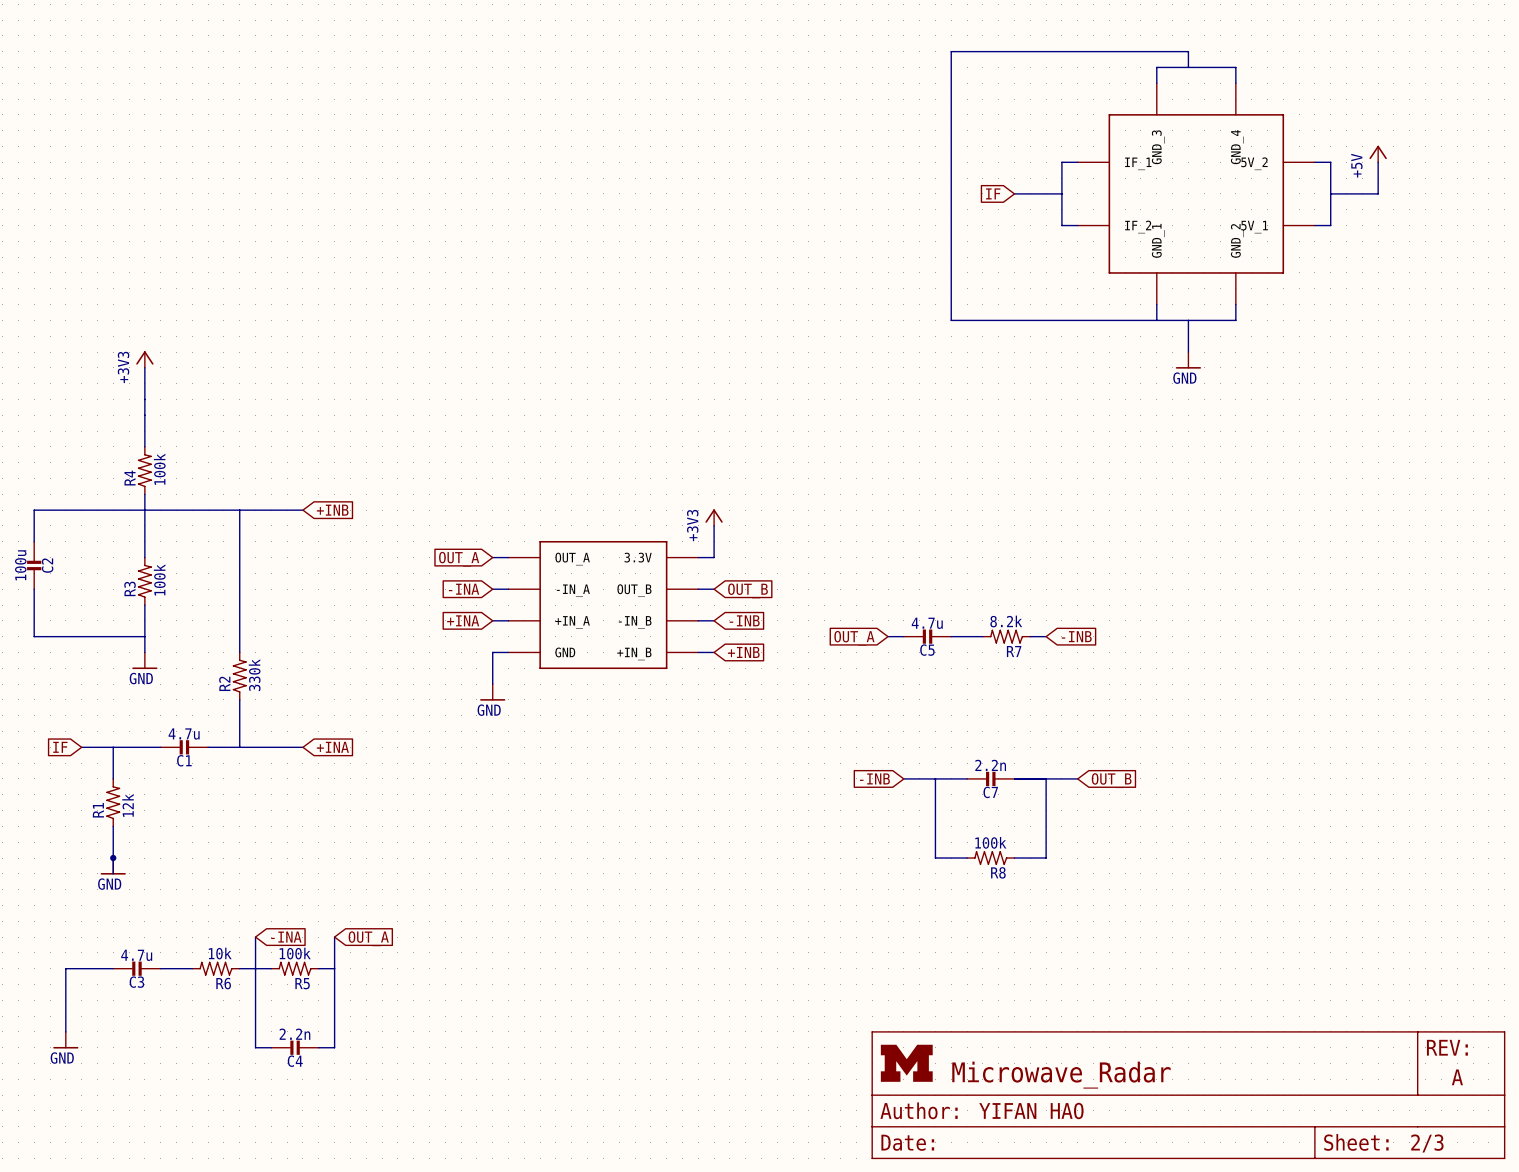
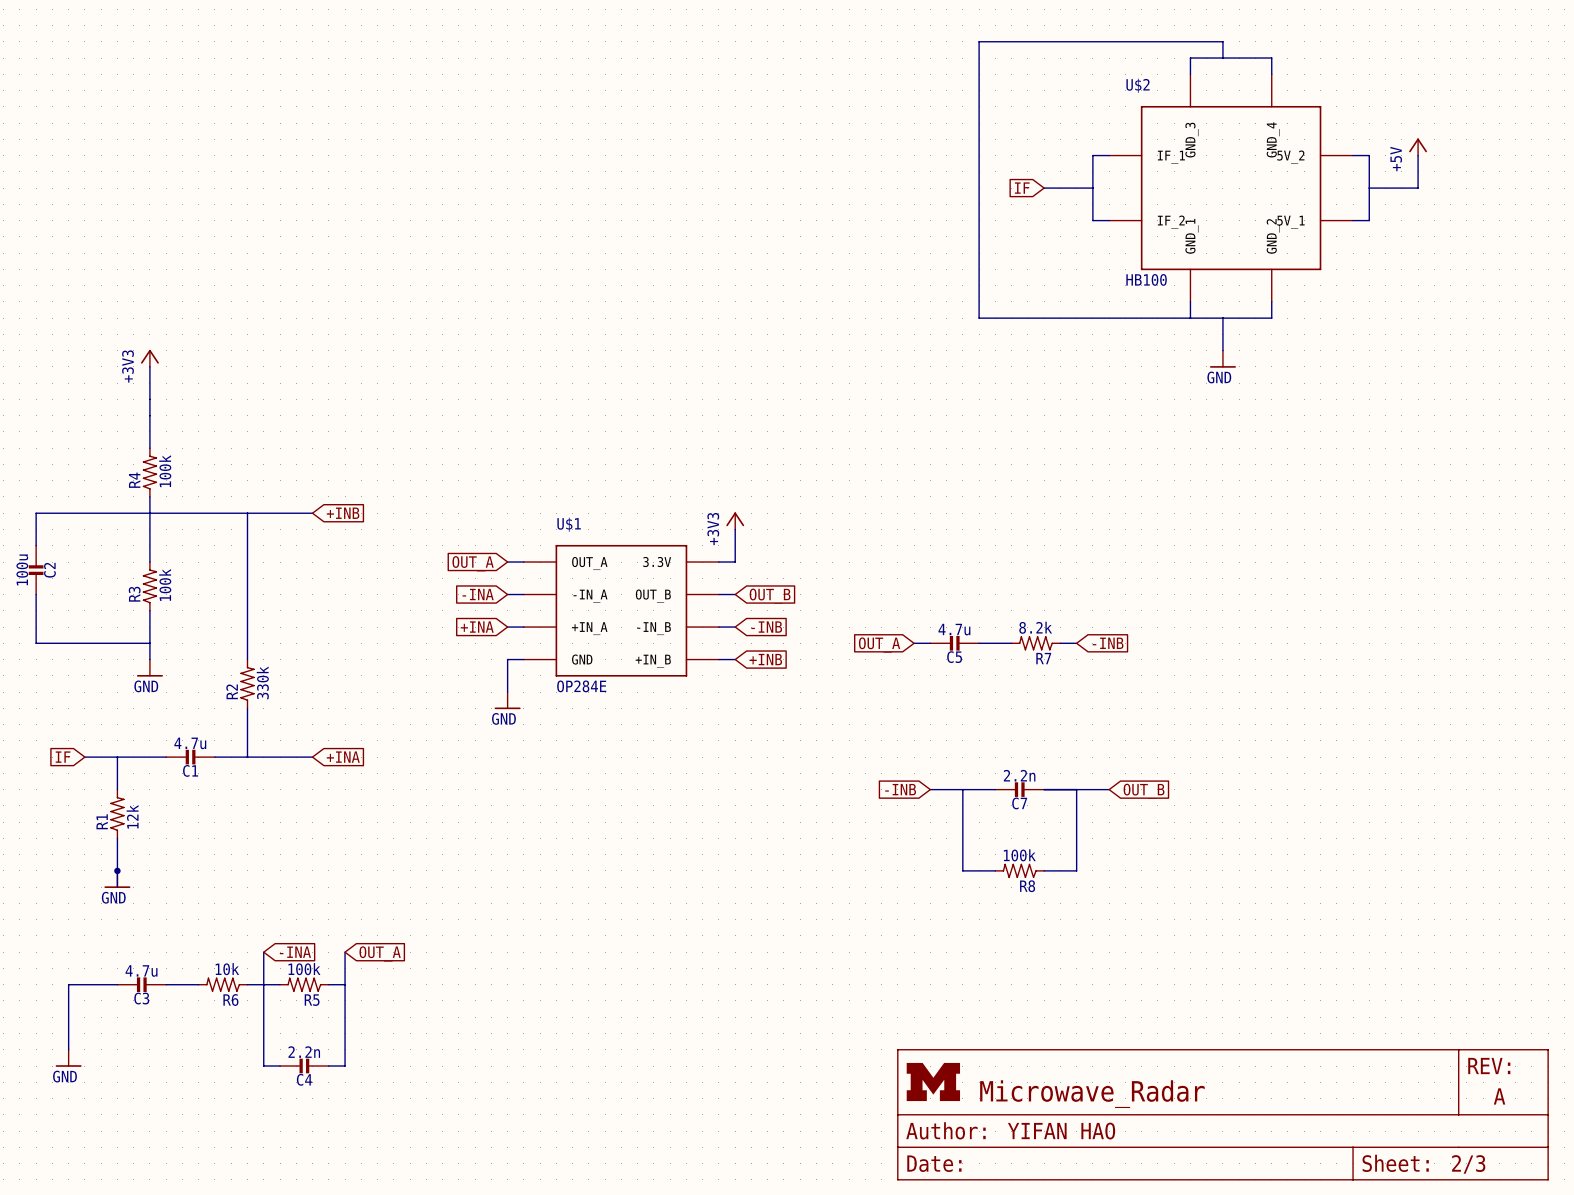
U$2 name: none -> U$2 (1138, 85)
U$2 value: none -> HB100 (1146, 279)
U$1 name: none -> U$1 (569, 524)
U$1 value: none -> OP284E (581, 686)

